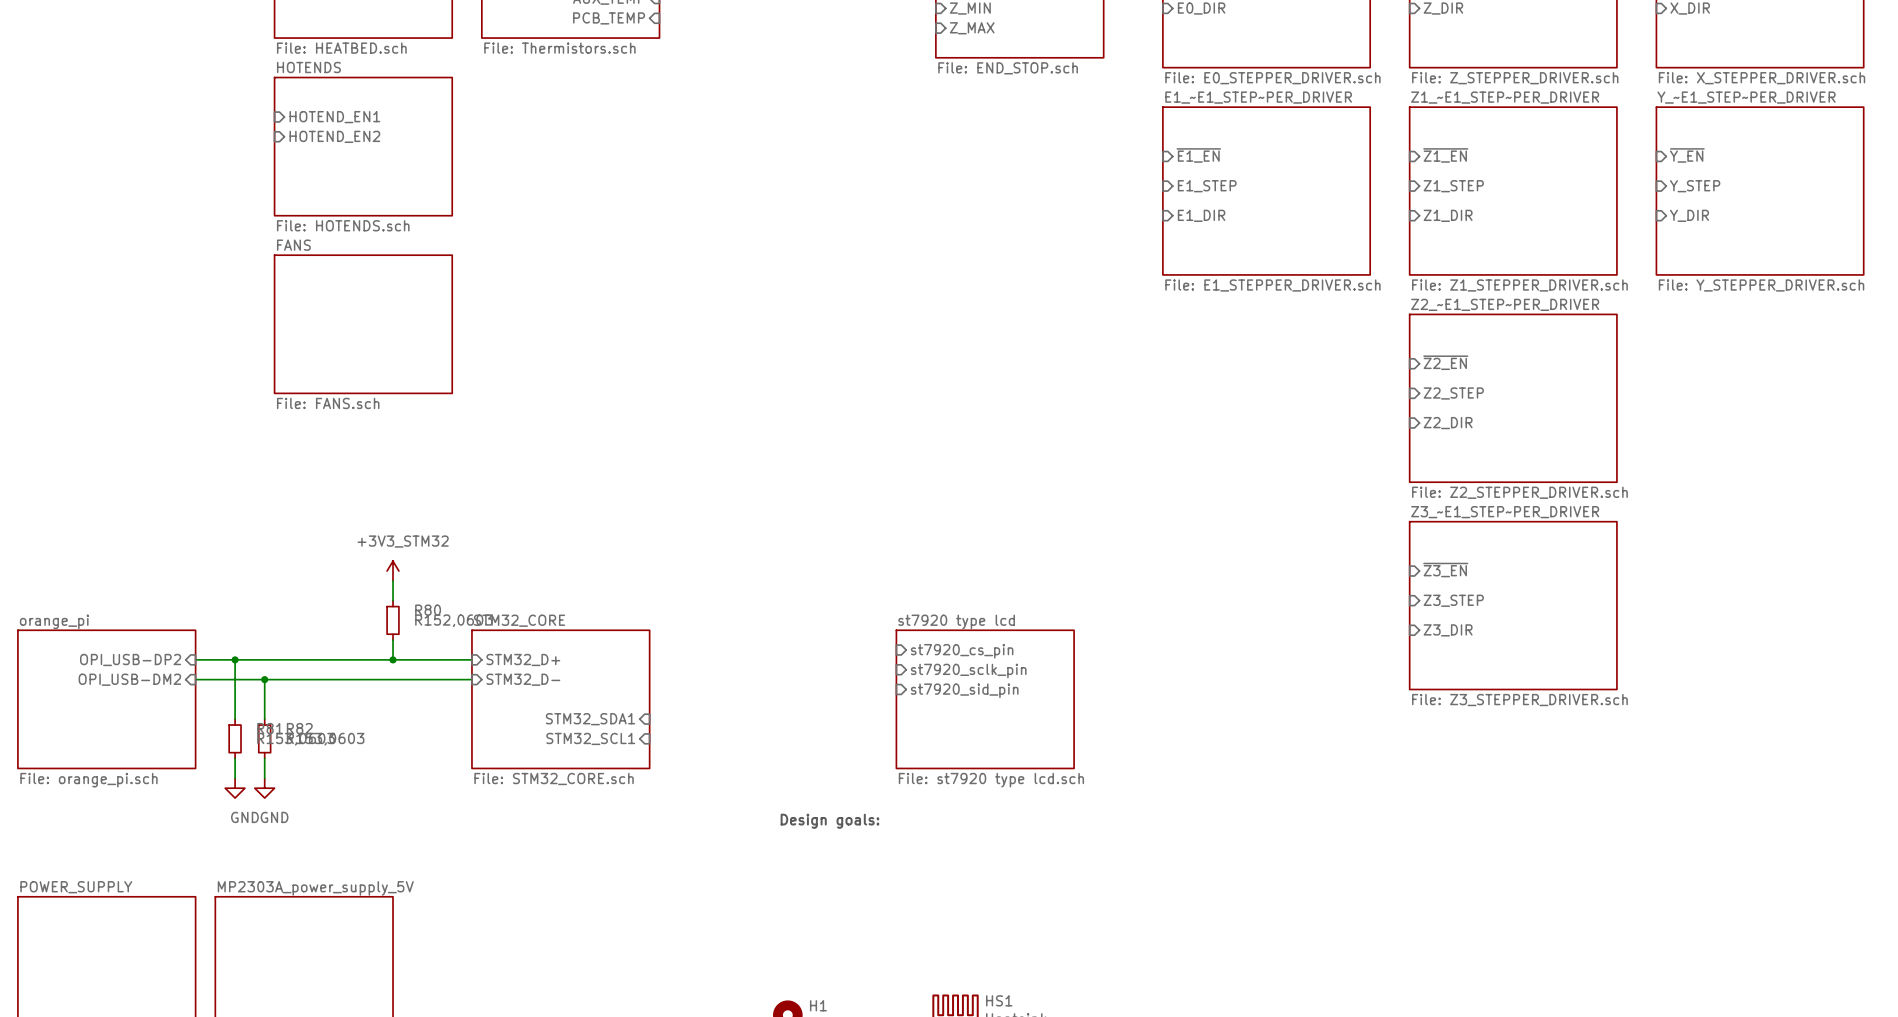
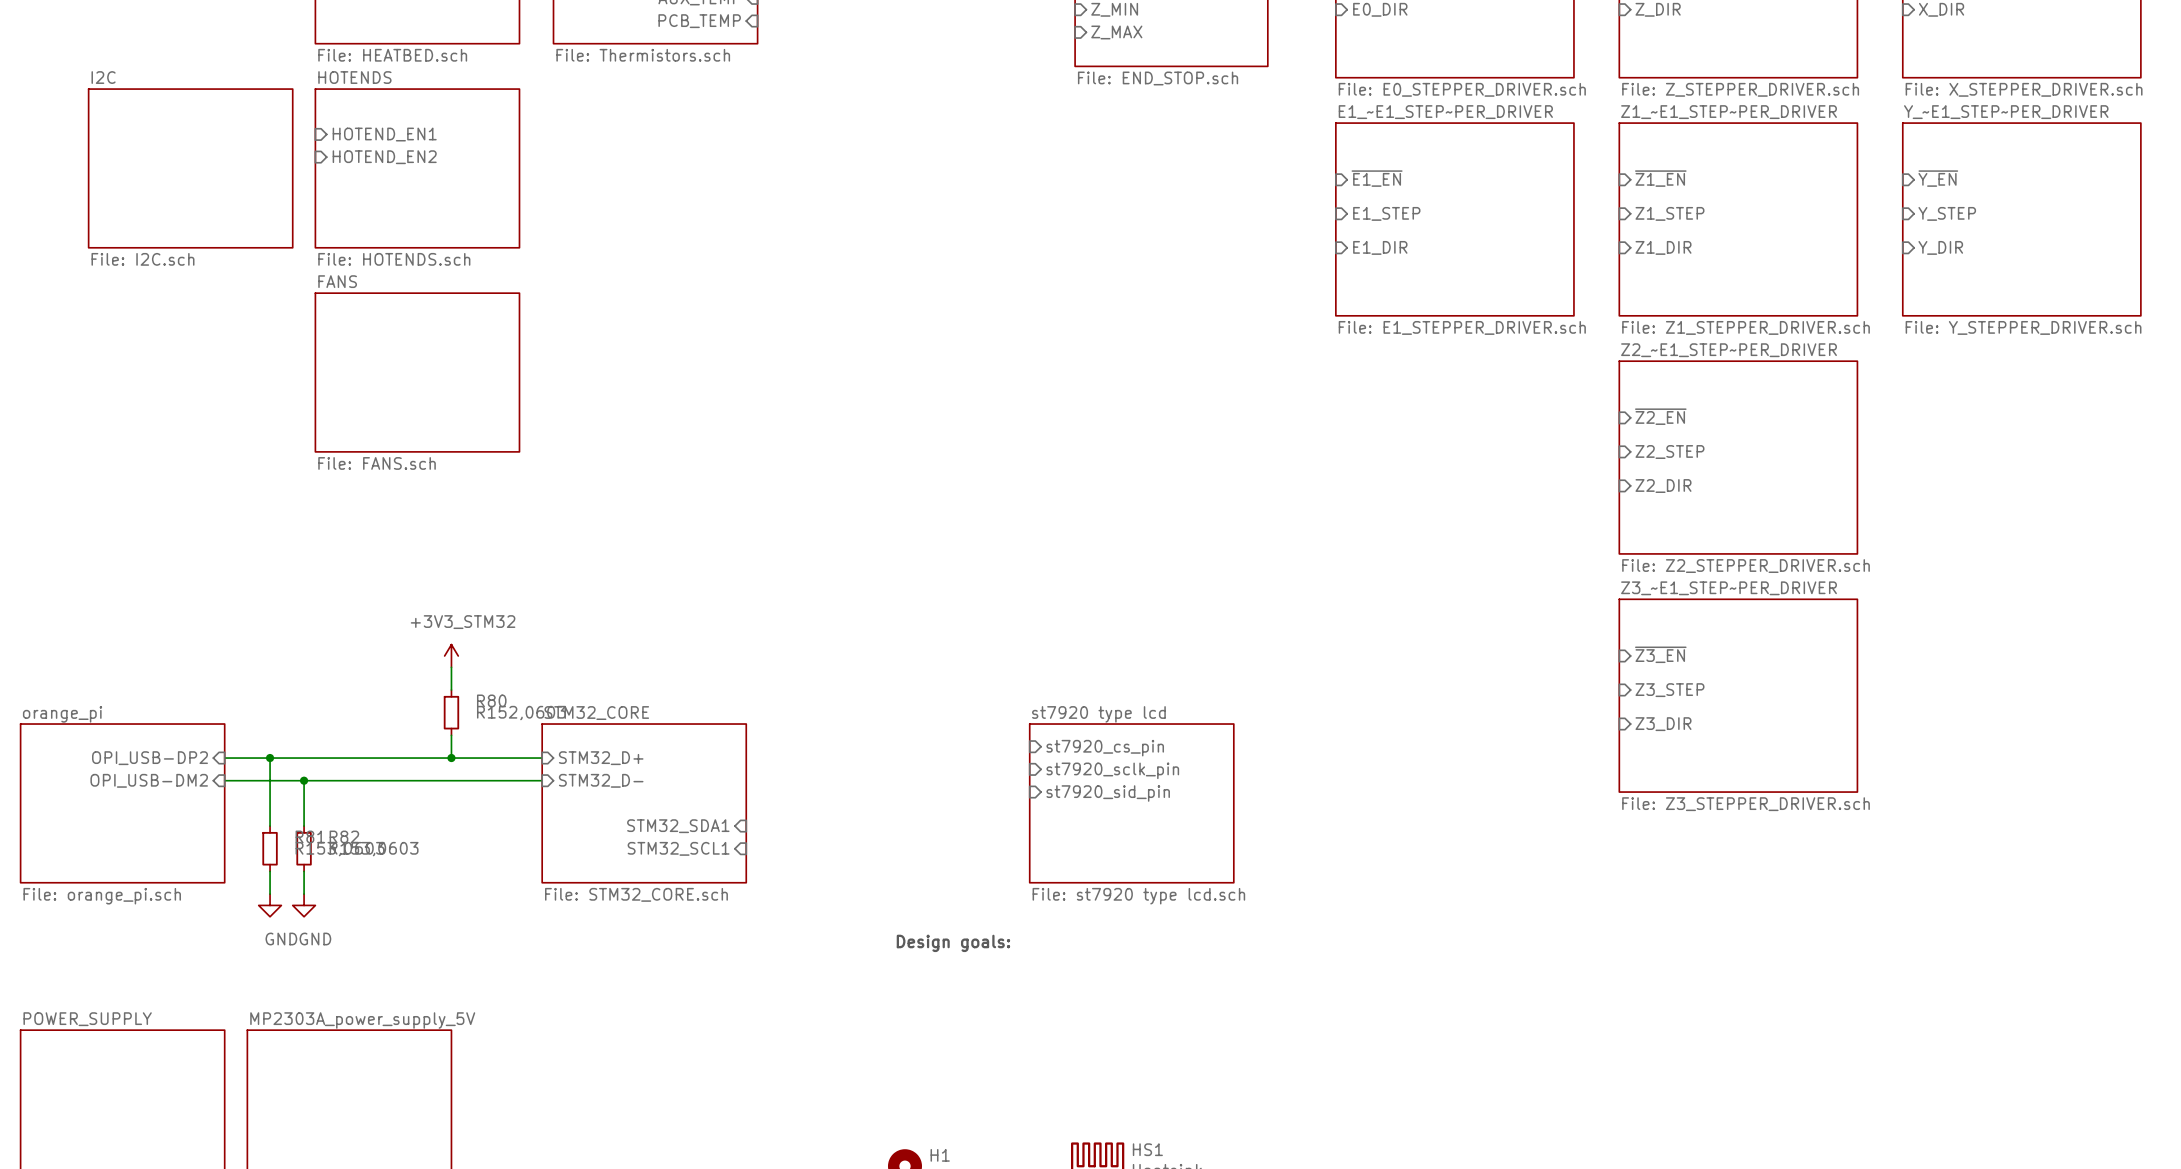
sheet I2C: none -> File: I2C.sch (190, 168)

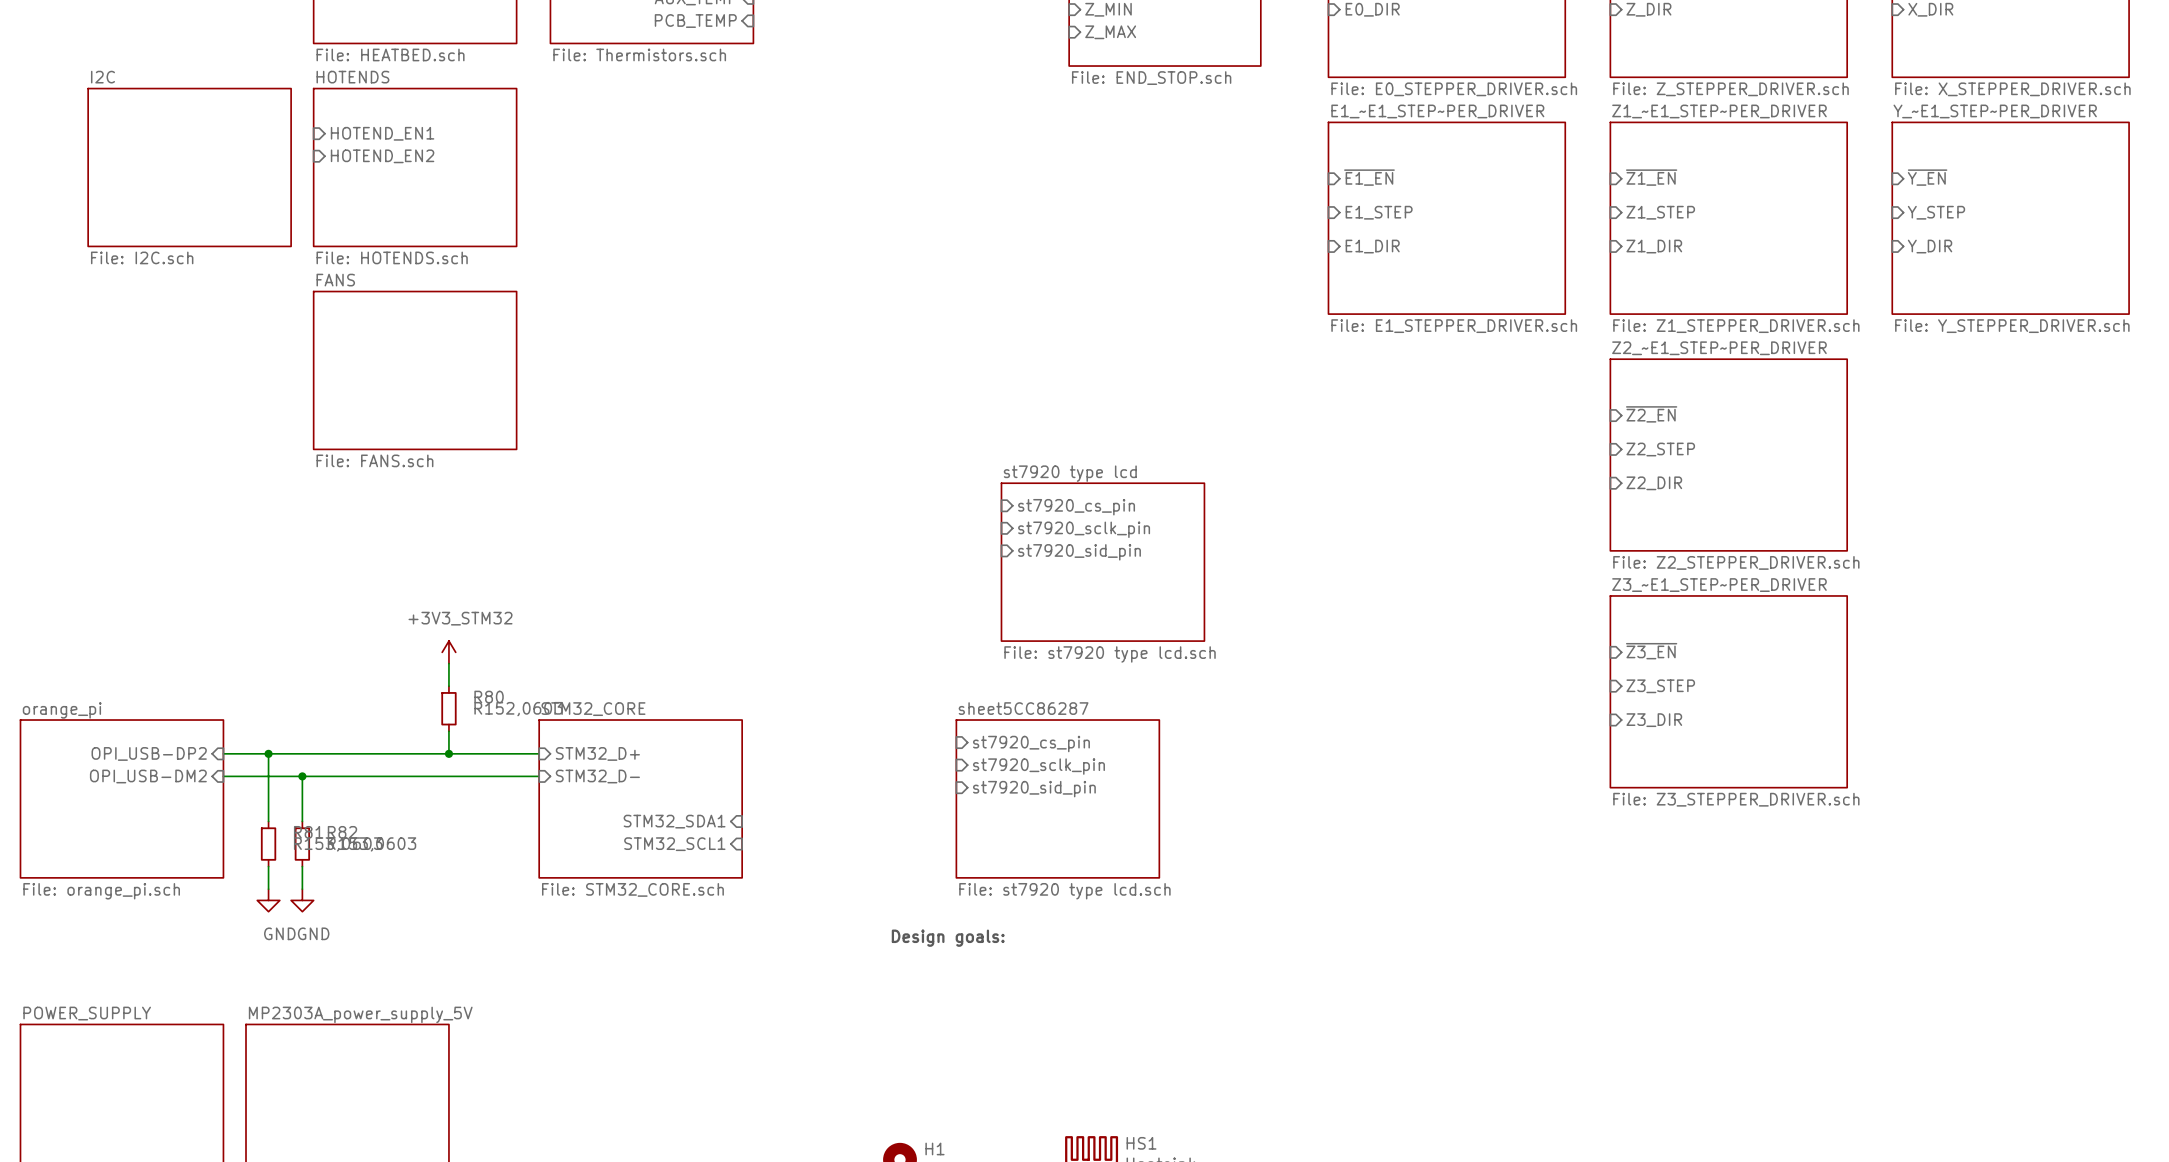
sheet pin: none -> st7920_cs_pin (1076, 507)
sheet pin: none -> st7920_sclk_pin (1084, 529)
sheet pin: none -> st7920_sid_pin (1079, 552)
sheet pin position: st7920_cs_pin (1105, 748) -> st7920_cs_pin (1031, 744)
sheet pin position: st7920_sclk_pin (1112, 770) -> st7920_sclk_pin (1038, 766)
sheet pin position: st7920_sid_pin (1108, 793) -> st7920_sid_pin (1034, 789)
sheet sheet5CC86287: none -> File: st7920 type lcd.sch (1057, 798)
sheet st7920 type lcd position: (1131, 803) -> (1102, 562)

